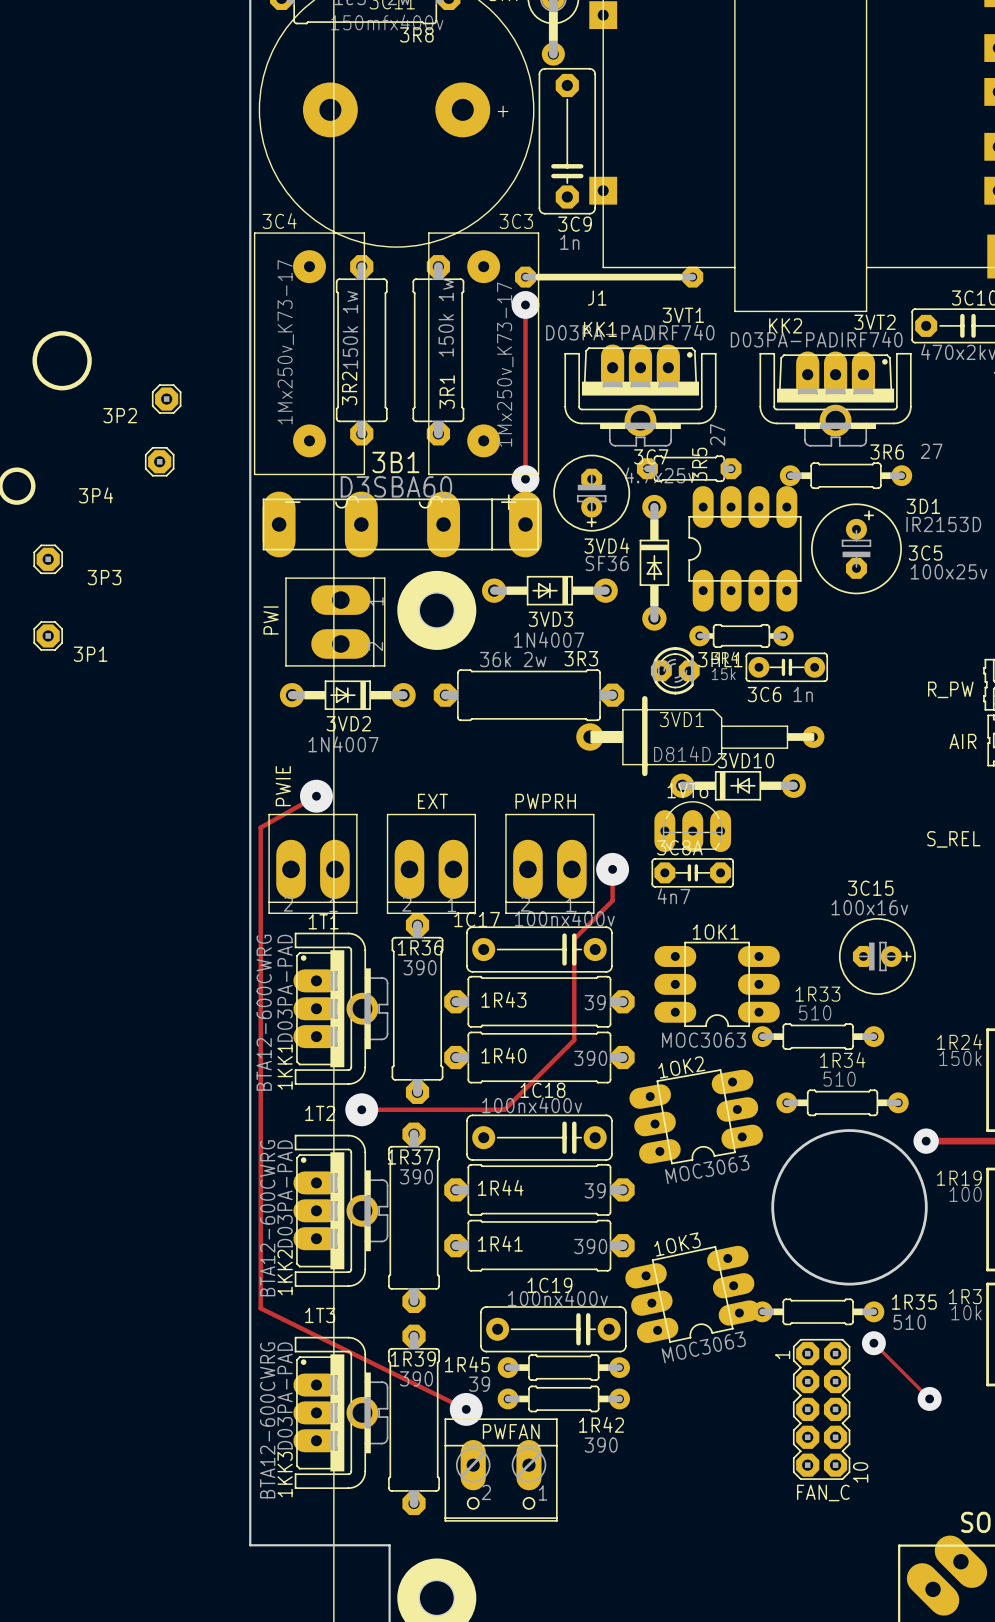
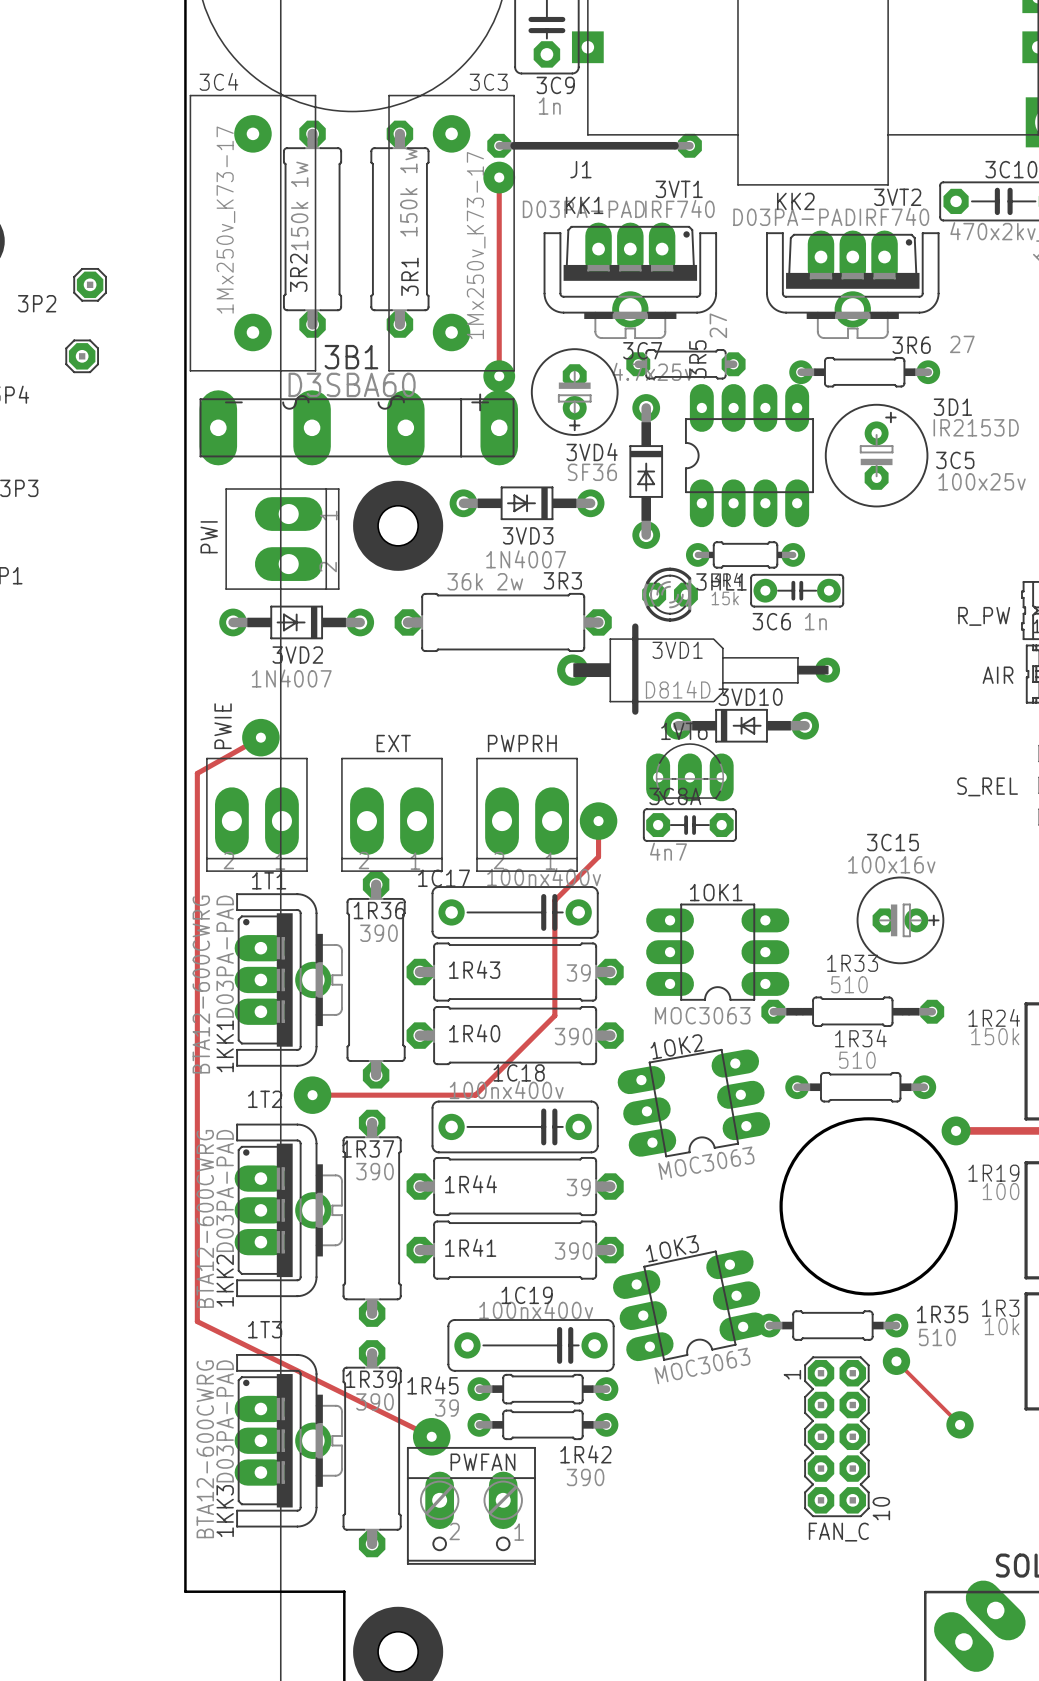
1R33 footprint: [751, 1023, 885, 1050] -> [761, 996, 945, 1028]

